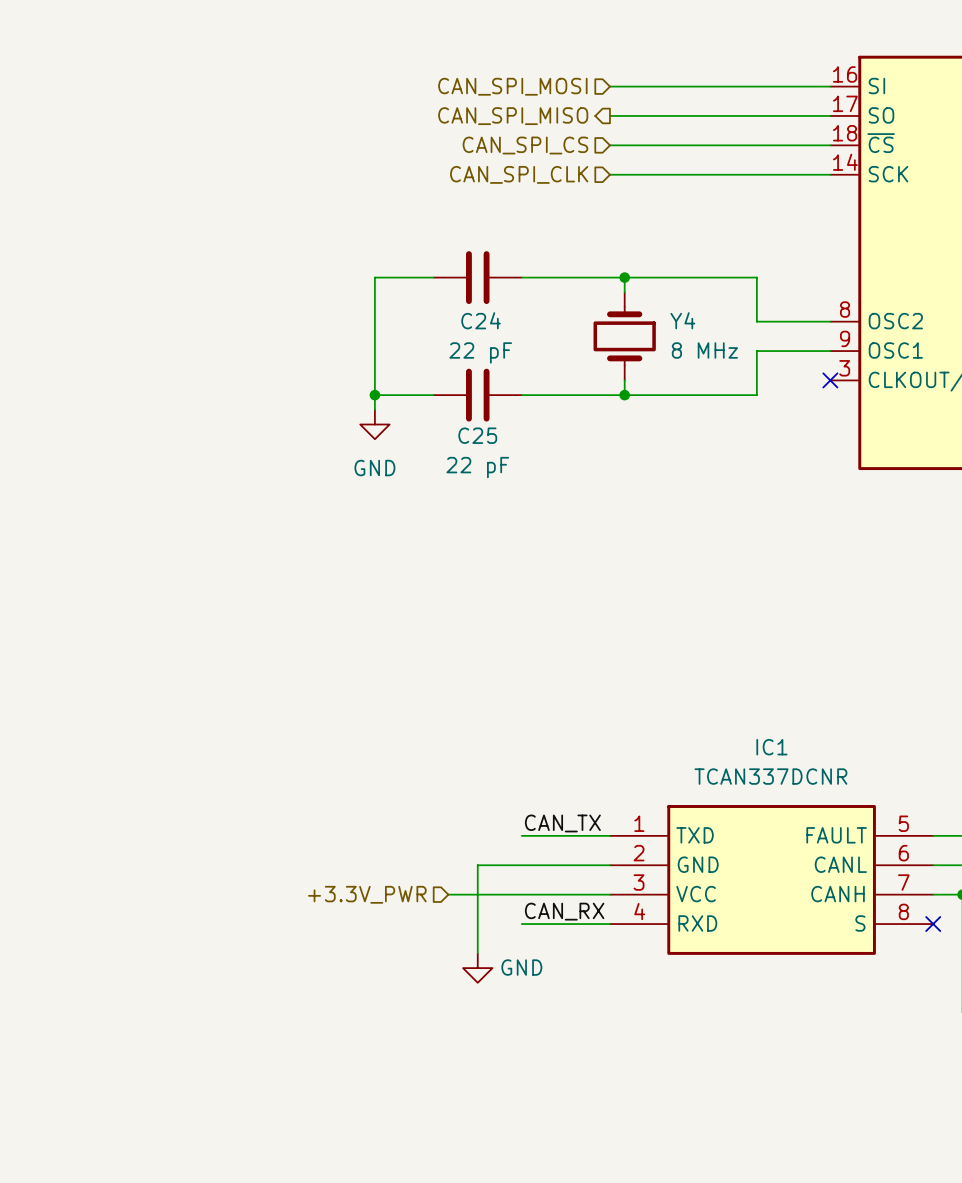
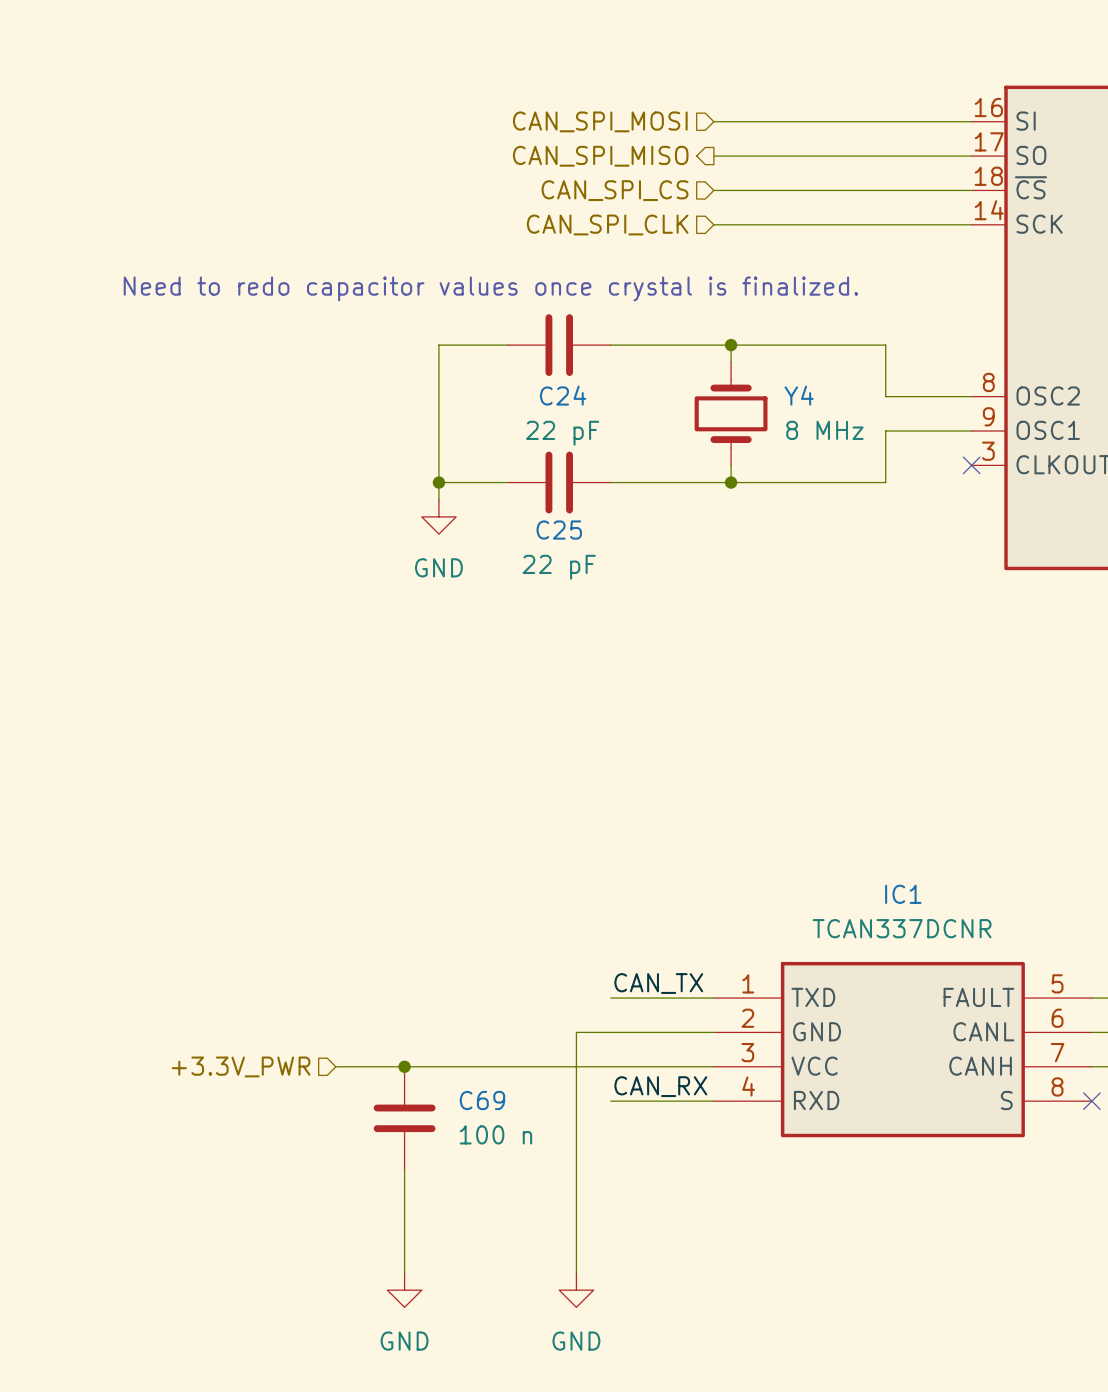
text: none -> Need to redo capacitor values once crystal is finalized. (490, 288)
wire: (492, 865) (477, 865) (477, 953) -> (576, 1032) (576, 1272)
wire: none -> (335, 1066) (524, 1066)
junction: none -> (404, 1066)
hierarchical label position: +3.3V_PWR (367, 894) -> +3.3V_PWR (241, 1066)
C69: none -> 100 n (404, 1118)
power symbol: GND (477, 968) -> none
wire: none -> (404, 1169) (404, 1272)
power symbol: none -> GND (404, 1290)
power symbol: none -> GND (576, 1290)

